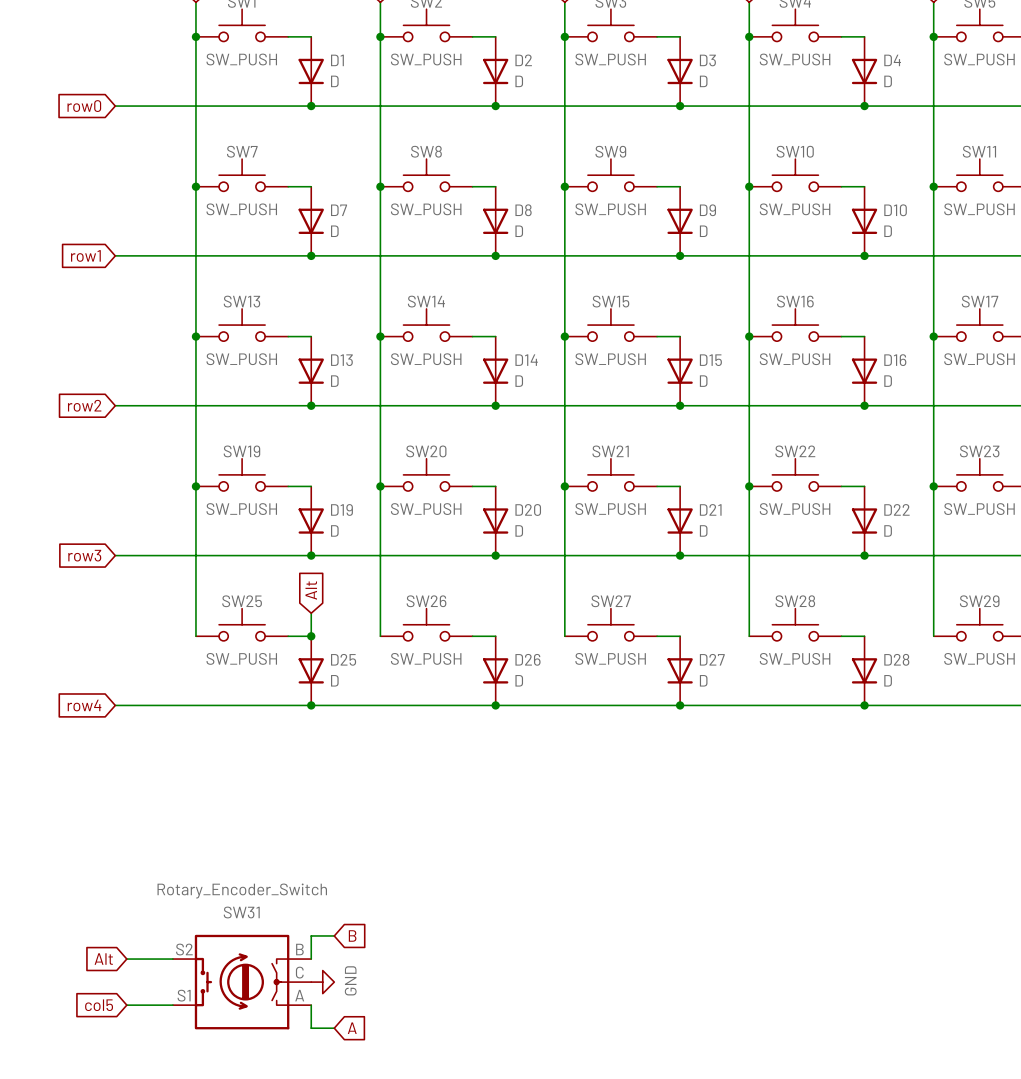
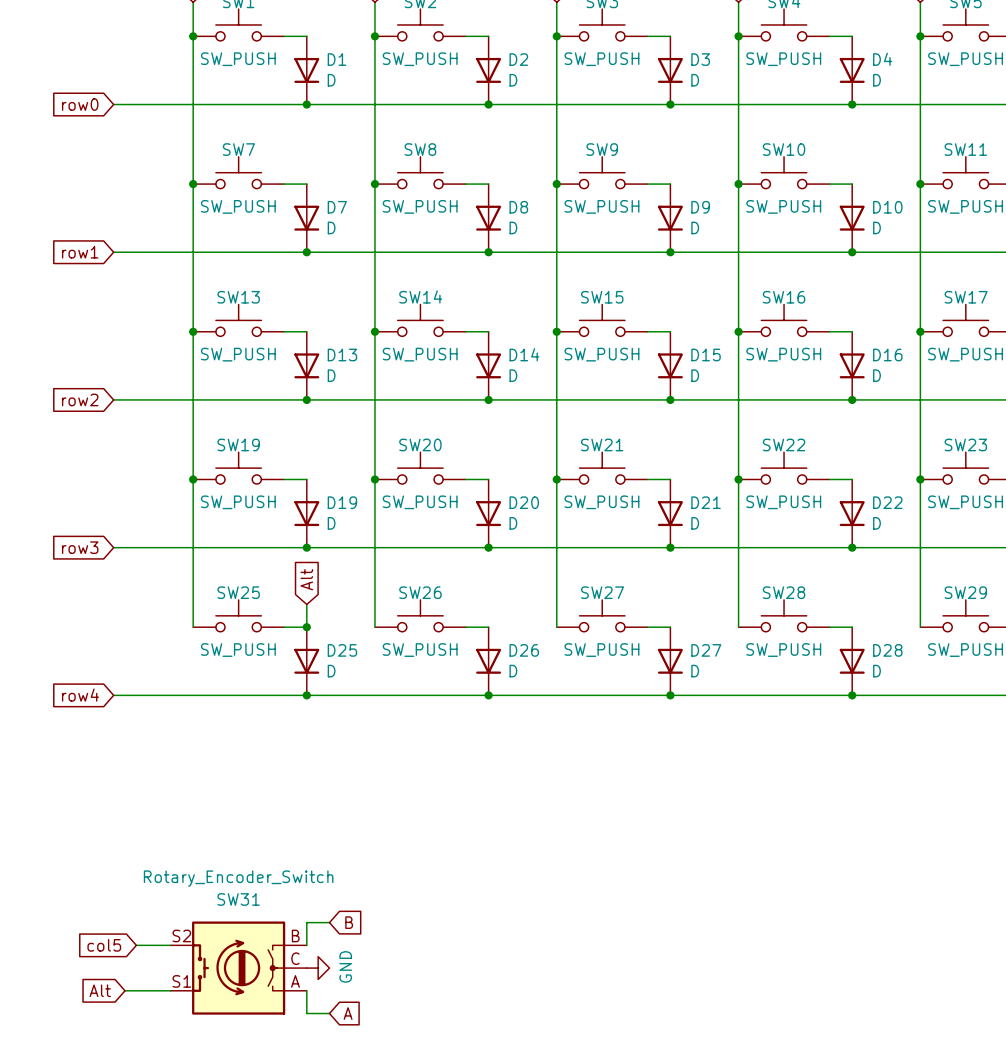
global label: Alt (103, 959) -> none
global label: none -> col5 (104, 945)
wire: (126, 959) (138, 959) -> none
global label: col5 (99, 1005) -> Alt (100, 990)

